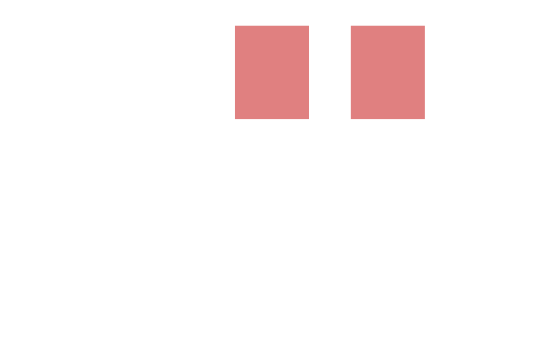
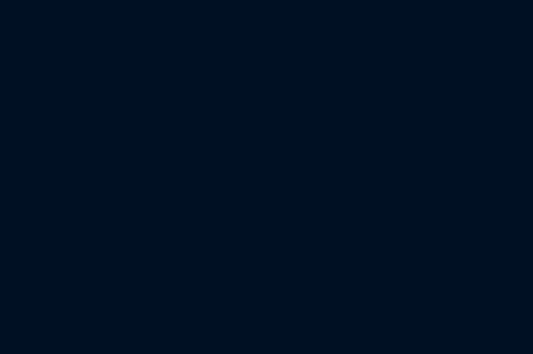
part: (329, 72) -> none

